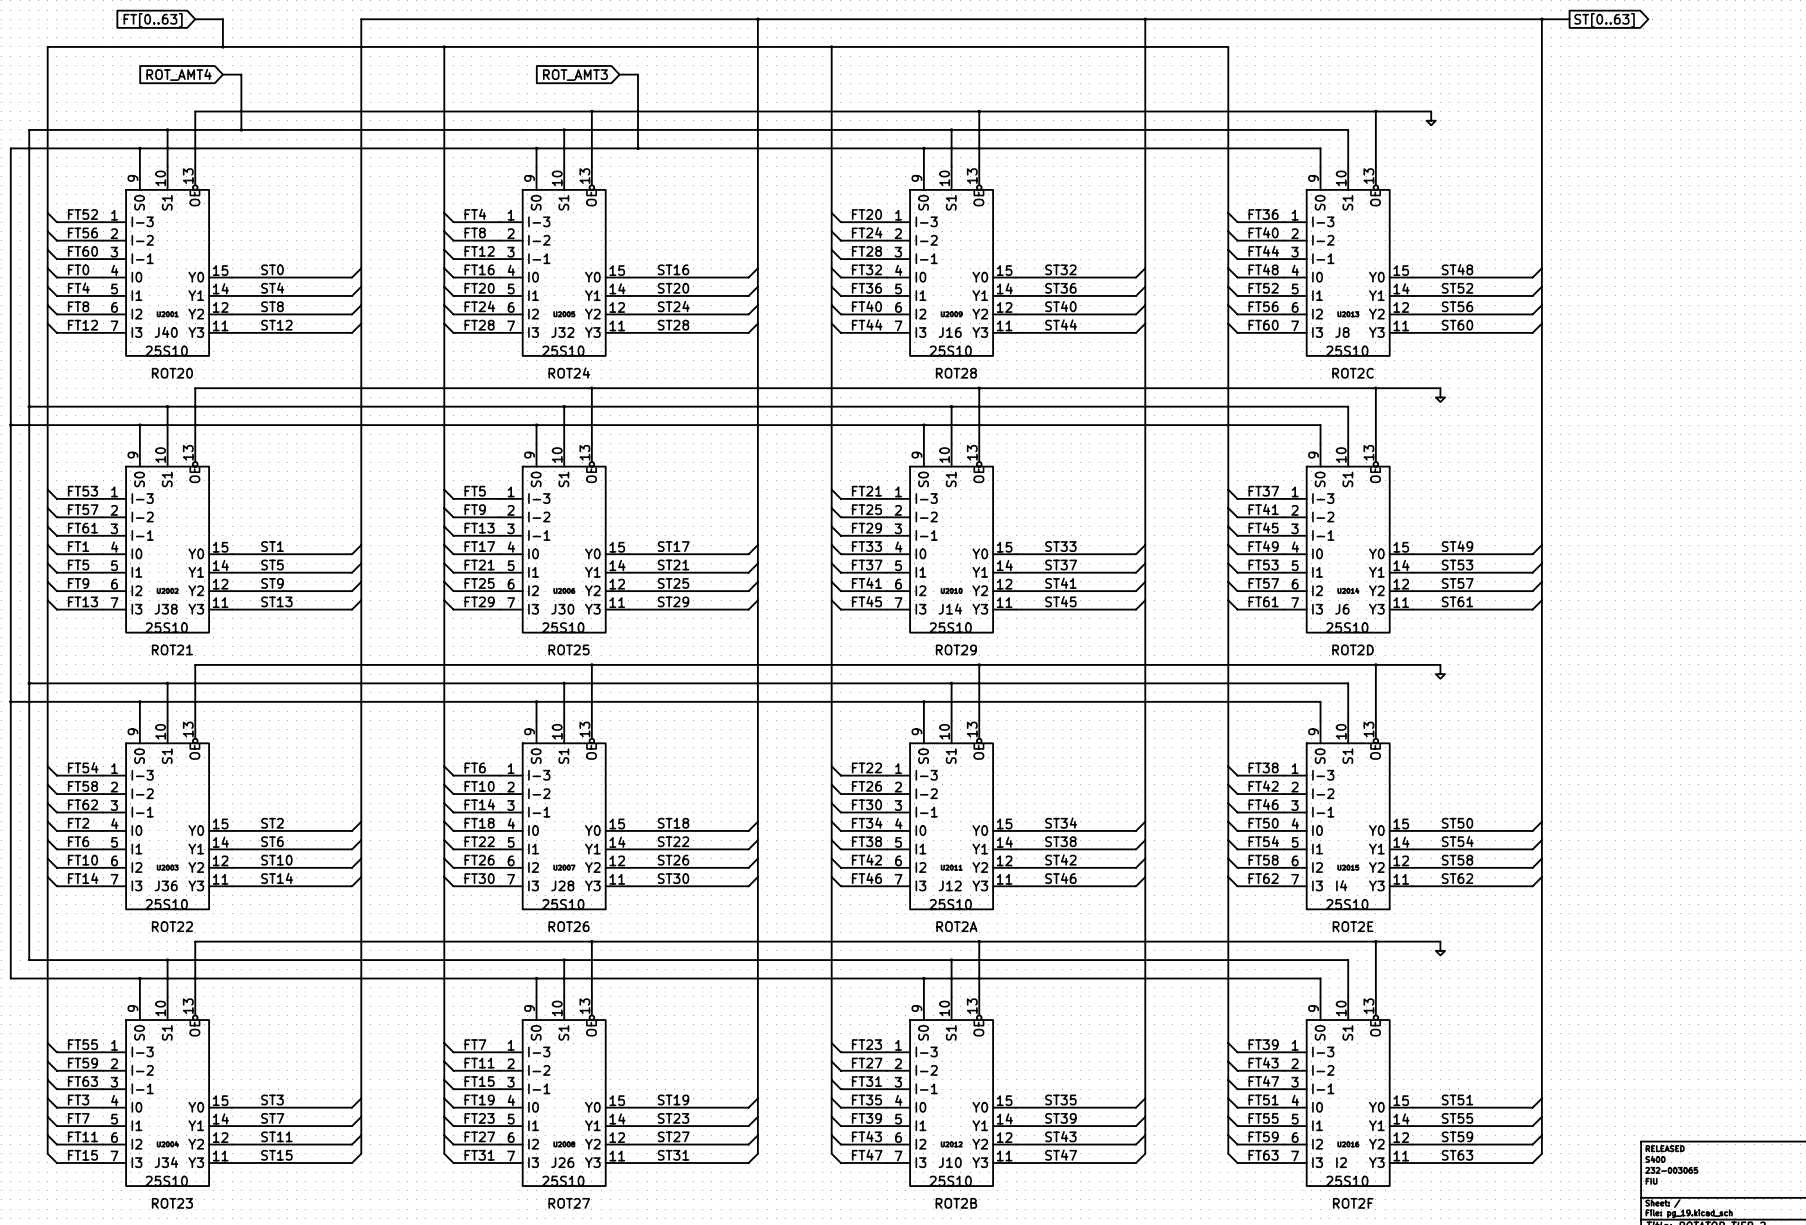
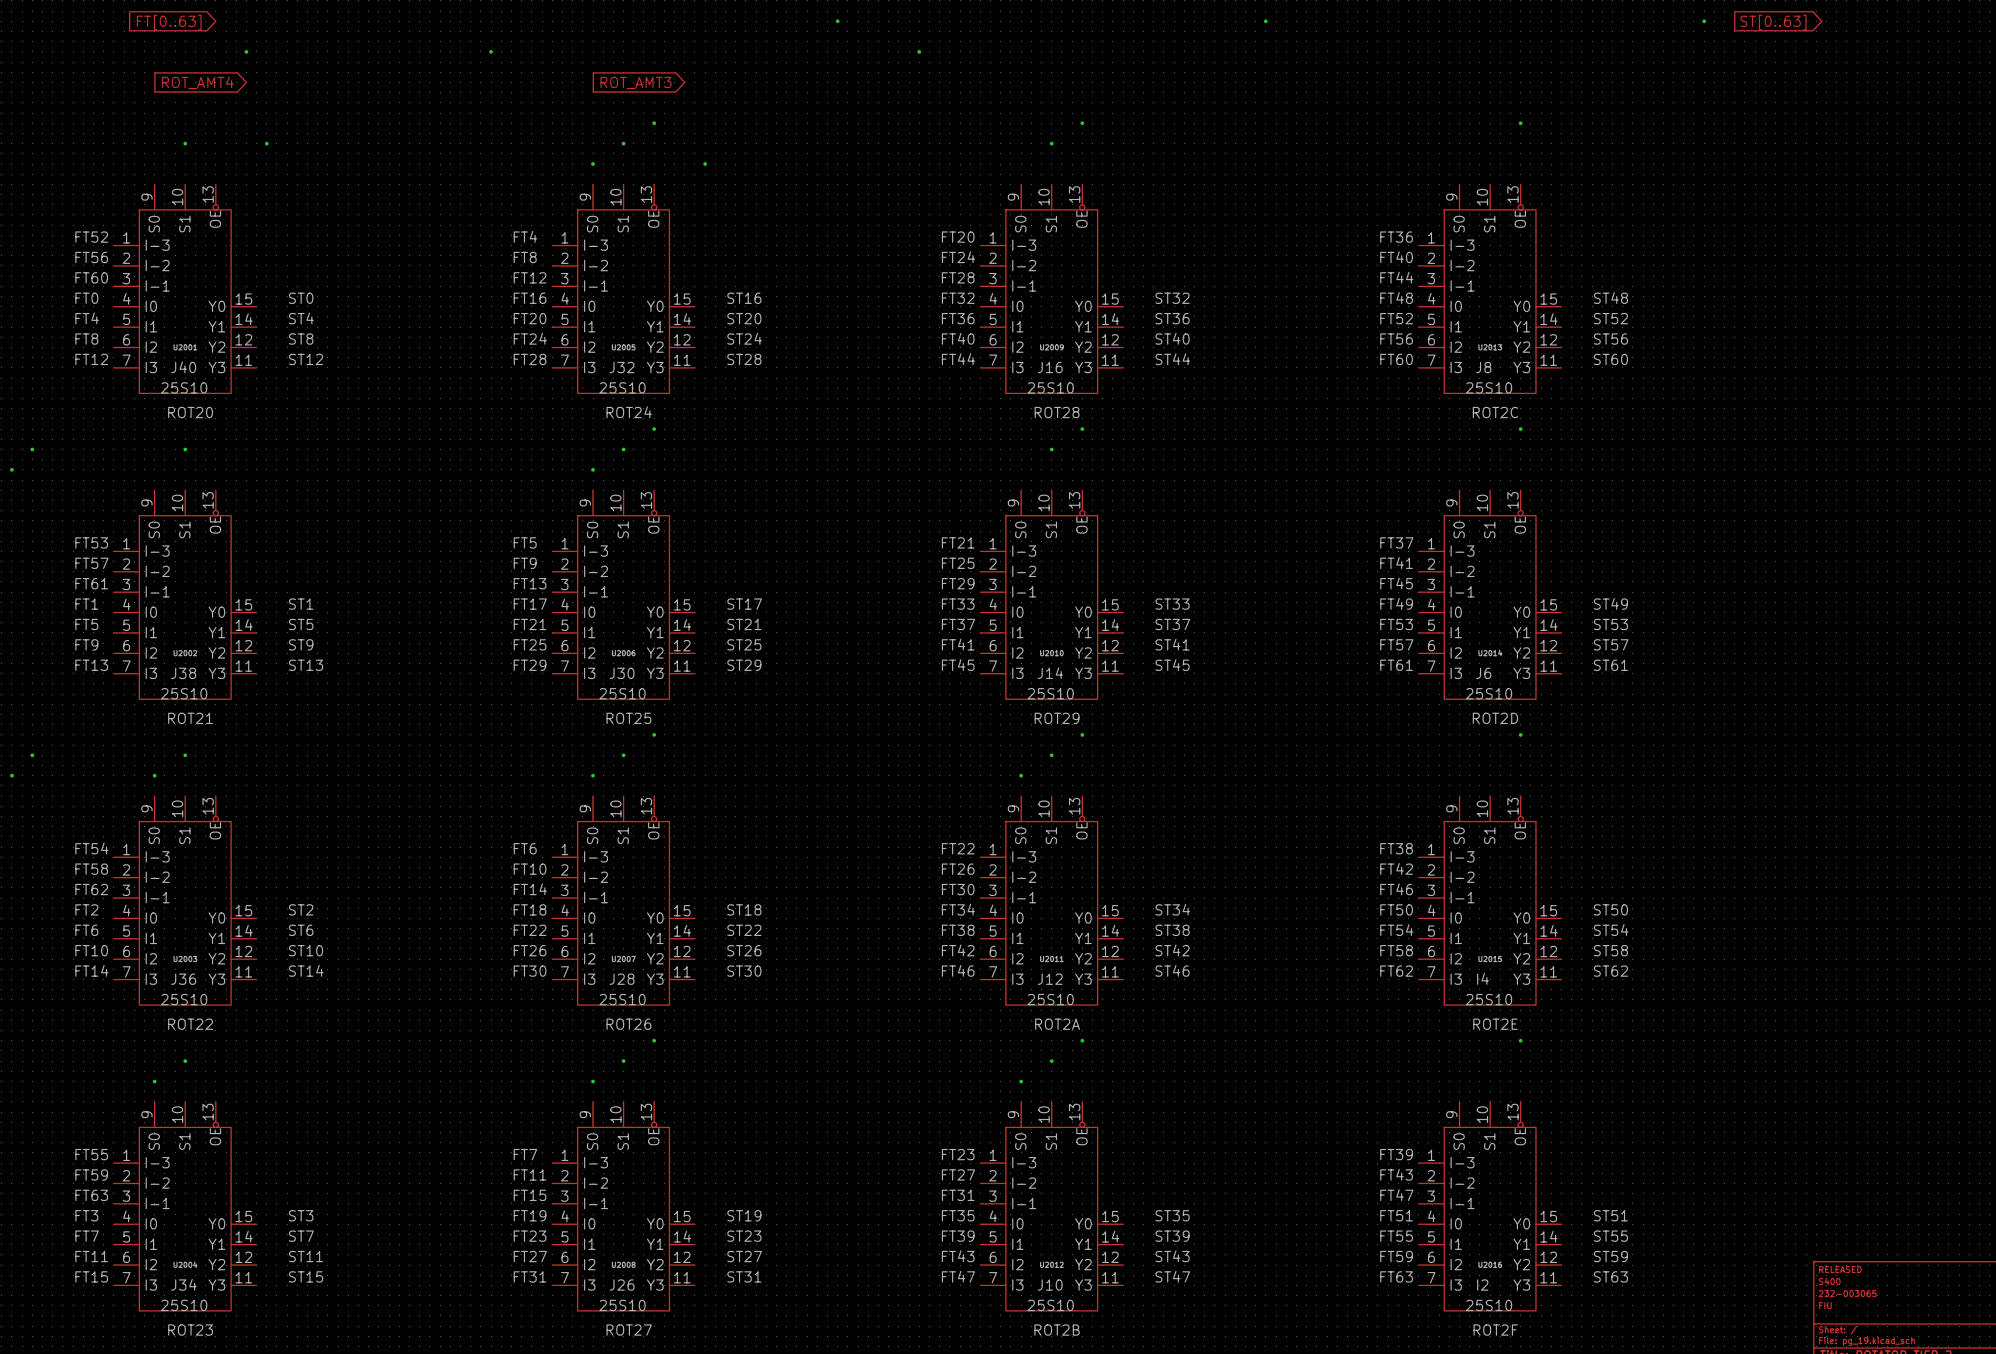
bus: (195, 19) (222, 19) (222, 46) -> none
bus: (757, 19) (757, 1153) -> none
bus: (1145, 19) (1145, 1153) -> none
bus: (1541, 19) (1541, 1153) -> none
bus: (1569, 19) (361, 19) (361, 1153) -> none
bus: (444, 46) (444, 1153) -> none
bus: (831, 46) (831, 1153) -> none
wire: (222, 74) (241, 74) (241, 129) -> none
wire: (619, 74) (637, 74) (637, 148) -> none
wire: (591, 111) (591, 166) -> none
wire: (979, 111) (979, 166) -> none
wire: (1375, 111) (1375, 166) -> none
wire: (1431, 111) (195, 111) (195, 166) -> none
power symbol: (1431, 118) -> none
wire: (167, 129) (167, 166) -> none
wire: (564, 129) (564, 166) -> none
wire: (951, 129) (951, 166) -> none
wire: (139, 148) (139, 166) -> none
wire: (536, 148) (536, 166) -> none
wire: (923, 148) (923, 166) -> none
wire: (1320, 166) (1320, 148) (10, 148) (10, 978) (1320, 978) (1320, 996) -> none
wire: (1348, 166) (1348, 129) (29, 129) (29, 960) (1348, 960) (1348, 996) -> none
wire: (47, 212) (56, 222) (103, 222) -> none
wire: (444, 212) (453, 222) (499, 222) -> none
wire: (831, 212) (840, 222) (887, 222) -> none
wire: (1228, 212) (1237, 222) (1283, 222) -> none
wire: (47, 231) (56, 240) (103, 240) -> none
wire: (444, 231) (453, 240) (499, 240) -> none
wire: (831, 231) (840, 240) (887, 240) -> none
wire: (1228, 231) (1237, 240) (1283, 240) -> none
wire: (47, 249) (56, 259) (103, 259) -> none
wire: (444, 249) (453, 259) (499, 259) -> none
wire: (831, 249) (840, 259) (887, 259) -> none
wire: (1228, 249) (1237, 259) (1283, 259) -> none
wire: (47, 268) (56, 277) (103, 277) -> none
wire: (361, 268) (352, 277) (232, 277) -> none
wire: (444, 268) (453, 277) (499, 277) -> none
wire: (757, 268) (748, 277) (628, 277) -> none
wire: (831, 268) (840, 277) (887, 277) -> none
wire: (1145, 268) (1136, 277) (1016, 277) -> none
wire: (1228, 268) (1237, 277) (1283, 277) -> none
wire: (1541, 268) (1532, 277) (1412, 277) -> none
wire: (47, 286) (56, 295) (103, 295) -> none
wire: (361, 286) (352, 295) (232, 295) -> none
wire: (444, 286) (453, 295) (499, 295) -> none
wire: (757, 286) (748, 295) (628, 295) -> none
wire: (831, 286) (840, 295) (887, 295) -> none
wire: (1145, 286) (1136, 295) (1016, 295) -> none
wire: (1228, 286) (1237, 295) (1283, 295) -> none
wire: (1541, 286) (1532, 295) (1412, 295) -> none
wire: (47, 305) (56, 314) (103, 314) -> none
wire: (361, 305) (352, 314) (232, 314) -> none
wire: (444, 305) (453, 314) (499, 314) -> none
wire: (757, 305) (748, 314) (628, 314) -> none
wire: (831, 305) (840, 314) (887, 314) -> none
wire: (1145, 305) (1136, 314) (1016, 314) -> none
wire: (1228, 305) (1237, 314) (1283, 314) -> none
wire: (1541, 305) (1532, 314) (1412, 314) -> none
wire: (47, 323) (56, 332) (103, 332) -> none
wire: (361, 323) (352, 332) (232, 332) -> none
wire: (444, 323) (453, 332) (499, 332) -> none
wire: (757, 323) (748, 332) (628, 332) -> none
wire: (831, 323) (840, 332) (887, 332) -> none
wire: (1145, 323) (1136, 332) (1016, 332) -> none
wire: (1228, 323) (1237, 332) (1283, 332) -> none
wire: (1541, 323) (1532, 332) (1412, 332) -> none
wire: (591, 388) (591, 443) -> none
wire: (979, 388) (979, 443) -> none
wire: (1375, 388) (1375, 443) -> none
wire: (1440, 388) (195, 388) (195, 443) -> none
power symbol: (1440, 395) -> none
wire: (29, 406) (1348, 406) (1348, 443) -> none
wire: (167, 406) (167, 443) -> none
wire: (564, 406) (564, 443) -> none
wire: (951, 406) (951, 443) -> none
wire: (10, 425) (1320, 425) (1320, 443) -> none
wire: (139, 425) (139, 443) -> none
wire: (536, 425) (536, 443) -> none
wire: (923, 425) (923, 443) -> none
wire: (47, 489) (56, 498) (103, 498) -> none
wire: (444, 489) (453, 498) (499, 498) -> none
wire: (831, 489) (840, 498) (887, 498) -> none
wire: (1228, 489) (1237, 498) (1283, 498) -> none
wire: (47, 508) (56, 517) (103, 517) -> none
wire: (444, 508) (453, 517) (499, 517) -> none
wire: (831, 508) (840, 517) (887, 517) -> none
wire: (1228, 508) (1237, 517) (1283, 517) -> none
wire: (47, 526) (56, 535) (103, 535) -> none
wire: (444, 526) (453, 535) (499, 535) -> none
wire: (831, 526) (840, 535) (887, 535) -> none
wire: (1228, 526) (1237, 535) (1283, 535) -> none
wire: (47, 545) (56, 554) (103, 554) -> none
wire: (361, 545) (352, 554) (232, 554) -> none
wire: (444, 545) (453, 554) (499, 554) -> none
wire: (757, 545) (748, 554) (628, 554) -> none
wire: (831, 545) (840, 554) (887, 554) -> none
wire: (1145, 545) (1136, 554) (1016, 554) -> none
wire: (1228, 545) (1237, 554) (1283, 554) -> none
wire: (1541, 545) (1532, 554) (1412, 554) -> none
wire: (47, 563) (56, 572) (103, 572) -> none
wire: (361, 563) (352, 572) (232, 572) -> none
wire: (444, 563) (453, 572) (499, 572) -> none
wire: (757, 563) (748, 572) (628, 572) -> none
wire: (831, 563) (840, 572) (887, 572) -> none
wire: (1145, 563) (1136, 572) (1016, 572) -> none
wire: (1228, 563) (1237, 572) (1283, 572) -> none
wire: (1541, 563) (1532, 572) (1412, 572) -> none
wire: (47, 581) (56, 591) (103, 591) -> none
wire: (361, 581) (352, 591) (232, 591) -> none
wire: (444, 581) (453, 591) (499, 591) -> none
wire: (757, 581) (748, 591) (628, 591) -> none
wire: (831, 581) (840, 591) (887, 591) -> none
wire: (1145, 581) (1136, 591) (1016, 591) -> none
wire: (1228, 581) (1237, 591) (1283, 591) -> none
wire: (1541, 581) (1532, 591) (1412, 591) -> none
wire: (47, 600) (56, 609) (103, 609) -> none
wire: (361, 600) (352, 609) (232, 609) -> none
wire: (444, 600) (453, 609) (499, 609) -> none
wire: (757, 600) (748, 609) (628, 609) -> none
wire: (831, 600) (840, 609) (887, 609) -> none
wire: (1145, 600) (1136, 609) (1016, 609) -> none
wire: (1228, 600) (1237, 609) (1283, 609) -> none
wire: (1541, 600) (1532, 609) (1412, 609) -> none
wire: (591, 664) (591, 720) -> none
wire: (979, 664) (979, 720) -> none
wire: (1375, 664) (1375, 720) -> none
wire: (1440, 664) (195, 664) (195, 720) -> none
power symbol: (1440, 671) -> none
wire: (29, 683) (1348, 683) (1348, 720) -> none
wire: (167, 683) (167, 720) -> none
wire: (564, 683) (564, 720) -> none
wire: (951, 683) (951, 720) -> none
wire: (10, 701) (1320, 701) (1320, 720) -> none
wire: (139, 701) (139, 720) -> none
wire: (536, 701) (536, 720) -> none
wire: (923, 701) (923, 720) -> none
wire: (47, 766) (56, 775) (103, 775) -> none
wire: (444, 766) (453, 775) (499, 775) -> none
wire: (831, 766) (840, 775) (887, 775) -> none
wire: (1228, 766) (1237, 775) (1283, 775) -> none
wire: (47, 784) (56, 794) (103, 794) -> none
wire: (444, 784) (453, 794) (499, 794) -> none
wire: (831, 784) (840, 794) (887, 794) -> none
wire: (1228, 784) (1237, 794) (1283, 794) -> none
wire: (47, 803) (56, 812) (103, 812) -> none
wire: (444, 803) (453, 812) (499, 812) -> none
wire: (831, 803) (840, 812) (887, 812) -> none
wire: (1228, 803) (1237, 812) (1283, 812) -> none
wire: (47, 821) (56, 830) (103, 830) -> none
wire: (361, 821) (352, 830) (232, 830) -> none
wire: (444, 821) (453, 830) (499, 830) -> none
wire: (757, 821) (748, 830) (628, 830) -> none
wire: (831, 821) (840, 830) (887, 830) -> none
wire: (1145, 821) (1136, 830) (1016, 830) -> none
wire: (1228, 821) (1237, 830) (1283, 830) -> none
wire: (1541, 821) (1532, 830) (1412, 830) -> none
wire: (47, 840) (56, 849) (103, 849) -> none
wire: (361, 840) (352, 849) (232, 849) -> none
wire: (444, 840) (453, 849) (499, 849) -> none
wire: (757, 840) (748, 849) (628, 849) -> none
wire: (831, 840) (840, 849) (887, 849) -> none
wire: (1145, 840) (1136, 849) (1016, 849) -> none
wire: (1228, 840) (1237, 849) (1283, 849) -> none
wire: (1541, 840) (1532, 849) (1412, 849) -> none
wire: (47, 858) (56, 867) (103, 867) -> none
wire: (361, 858) (352, 867) (232, 867) -> none
wire: (444, 858) (453, 867) (499, 867) -> none
wire: (757, 858) (748, 867) (628, 867) -> none
wire: (831, 858) (840, 867) (887, 867) -> none
wire: (1145, 858) (1136, 867) (1016, 867) -> none
wire: (1228, 858) (1237, 867) (1283, 867) -> none
wire: (1541, 858) (1532, 867) (1412, 867) -> none
wire: (47, 877) (56, 886) (103, 886) -> none
wire: (361, 877) (352, 886) (232, 886) -> none
wire: (444, 877) (453, 886) (499, 886) -> none
wire: (757, 877) (748, 886) (628, 886) -> none
wire: (831, 877) (840, 886) (887, 886) -> none
wire: (1145, 877) (1136, 886) (1016, 886) -> none
wire: (1228, 877) (1237, 886) (1283, 886) -> none
wire: (1541, 877) (1532, 886) (1412, 886) -> none
wire: (591, 941) (591, 996) -> none
wire: (979, 941) (979, 996) -> none
wire: (1375, 941) (1375, 996) -> none
wire: (1440, 941) (195, 941) (195, 996) -> none
power symbol: (1440, 948) -> none
wire: (167, 960) (167, 996) -> none
wire: (564, 960) (564, 996) -> none
wire: (951, 960) (951, 996) -> none
wire: (139, 978) (139, 996) -> none
wire: (536, 978) (536, 996) -> none
wire: (923, 978) (923, 996) -> none
wire: (47, 1043) (56, 1052) (103, 1052) -> none
wire: (444, 1043) (453, 1052) (499, 1052) -> none
wire: (831, 1043) (840, 1052) (887, 1052) -> none
wire: (1228, 1043) (1237, 1052) (1283, 1052) -> none
wire: (47, 1061) (56, 1070) (103, 1070) -> none
wire: (444, 1061) (453, 1070) (499, 1070) -> none
wire: (831, 1061) (840, 1070) (887, 1070) -> none
wire: (1228, 1061) (1237, 1070) (1283, 1070) -> none
wire: (47, 1079) (56, 1089) (103, 1089) -> none
wire: (444, 1079) (453, 1089) (499, 1089) -> none
wire: (831, 1079) (840, 1089) (887, 1089) -> none
wire: (1228, 1079) (1237, 1089) (1283, 1089) -> none
wire: (47, 1098) (56, 1107) (103, 1107) -> none
wire: (361, 1098) (352, 1107) (232, 1107) -> none
wire: (444, 1098) (453, 1107) (499, 1107) -> none
wire: (757, 1098) (748, 1107) (628, 1107) -> none
wire: (831, 1098) (840, 1107) (887, 1107) -> none
wire: (1145, 1098) (1136, 1107) (1016, 1107) -> none
wire: (1228, 1098) (1237, 1107) (1283, 1107) -> none
wire: (1541, 1098) (1532, 1107) (1412, 1107) -> none
wire: (47, 1116) (56, 1126) (103, 1126) -> none
wire: (361, 1116) (352, 1126) (232, 1126) -> none
wire: (444, 1116) (453, 1126) (499, 1126) -> none
wire: (757, 1116) (748, 1126) (628, 1126) -> none
wire: (831, 1116) (840, 1126) (887, 1126) -> none
wire: (1145, 1116) (1136, 1126) (1016, 1126) -> none
wire: (1228, 1116) (1237, 1126) (1283, 1126) -> none
wire: (1541, 1116) (1532, 1126) (1412, 1126) -> none
wire: (47, 1135) (56, 1144) (103, 1144) -> none
wire: (361, 1135) (352, 1144) (232, 1144) -> none
wire: (444, 1135) (453, 1144) (499, 1144) -> none
wire: (757, 1135) (748, 1144) (628, 1144) -> none
wire: (831, 1135) (840, 1144) (887, 1144) -> none
wire: (1145, 1135) (1136, 1144) (1016, 1144) -> none
wire: (1228, 1135) (1237, 1144) (1283, 1144) -> none
wire: (1541, 1135) (1532, 1144) (1412, 1144) -> none
bus: (47, 1153) (47, 46) (1228, 46) (1228, 1153) -> none
wire: (47, 1153) (56, 1162) (103, 1162) -> none
wire: (361, 1153) (352, 1162) (232, 1162) -> none
wire: (444, 1153) (453, 1162) (499, 1162) -> none
wire: (757, 1153) (748, 1162) (628, 1162) -> none
wire: (831, 1153) (840, 1162) (887, 1162) -> none
wire: (1145, 1153) (1136, 1162) (1016, 1162) -> none
wire: (1228, 1153) (1237, 1162) (1283, 1162) -> none
wire: (1541, 1153) (1532, 1162) (1412, 1162) -> none

